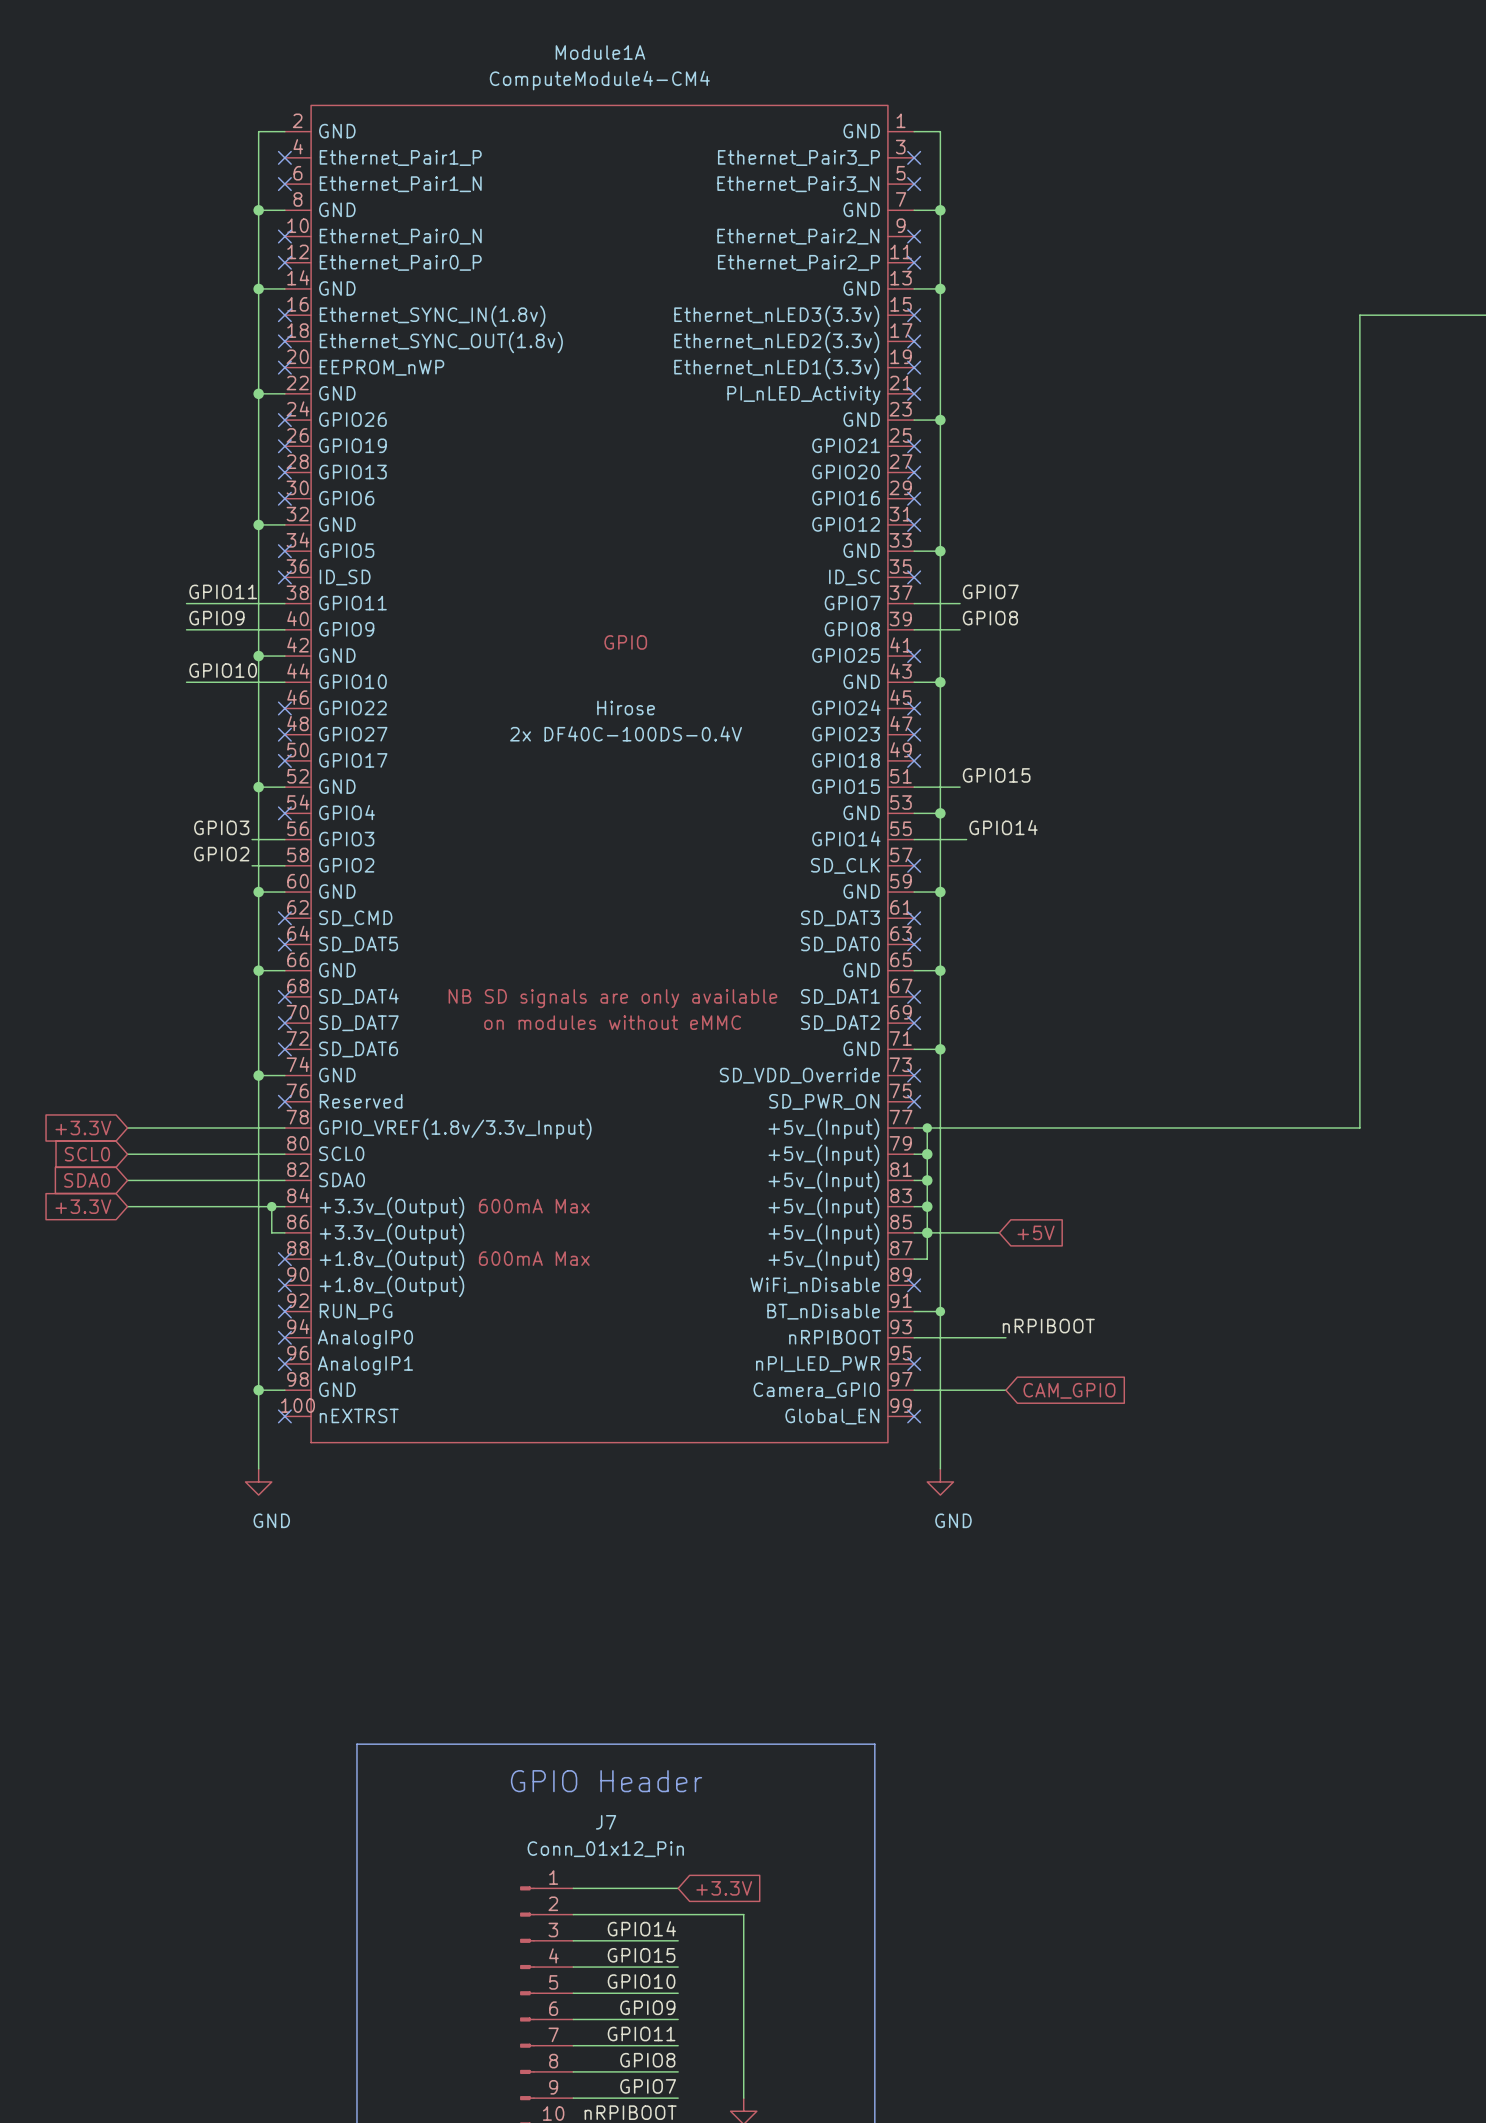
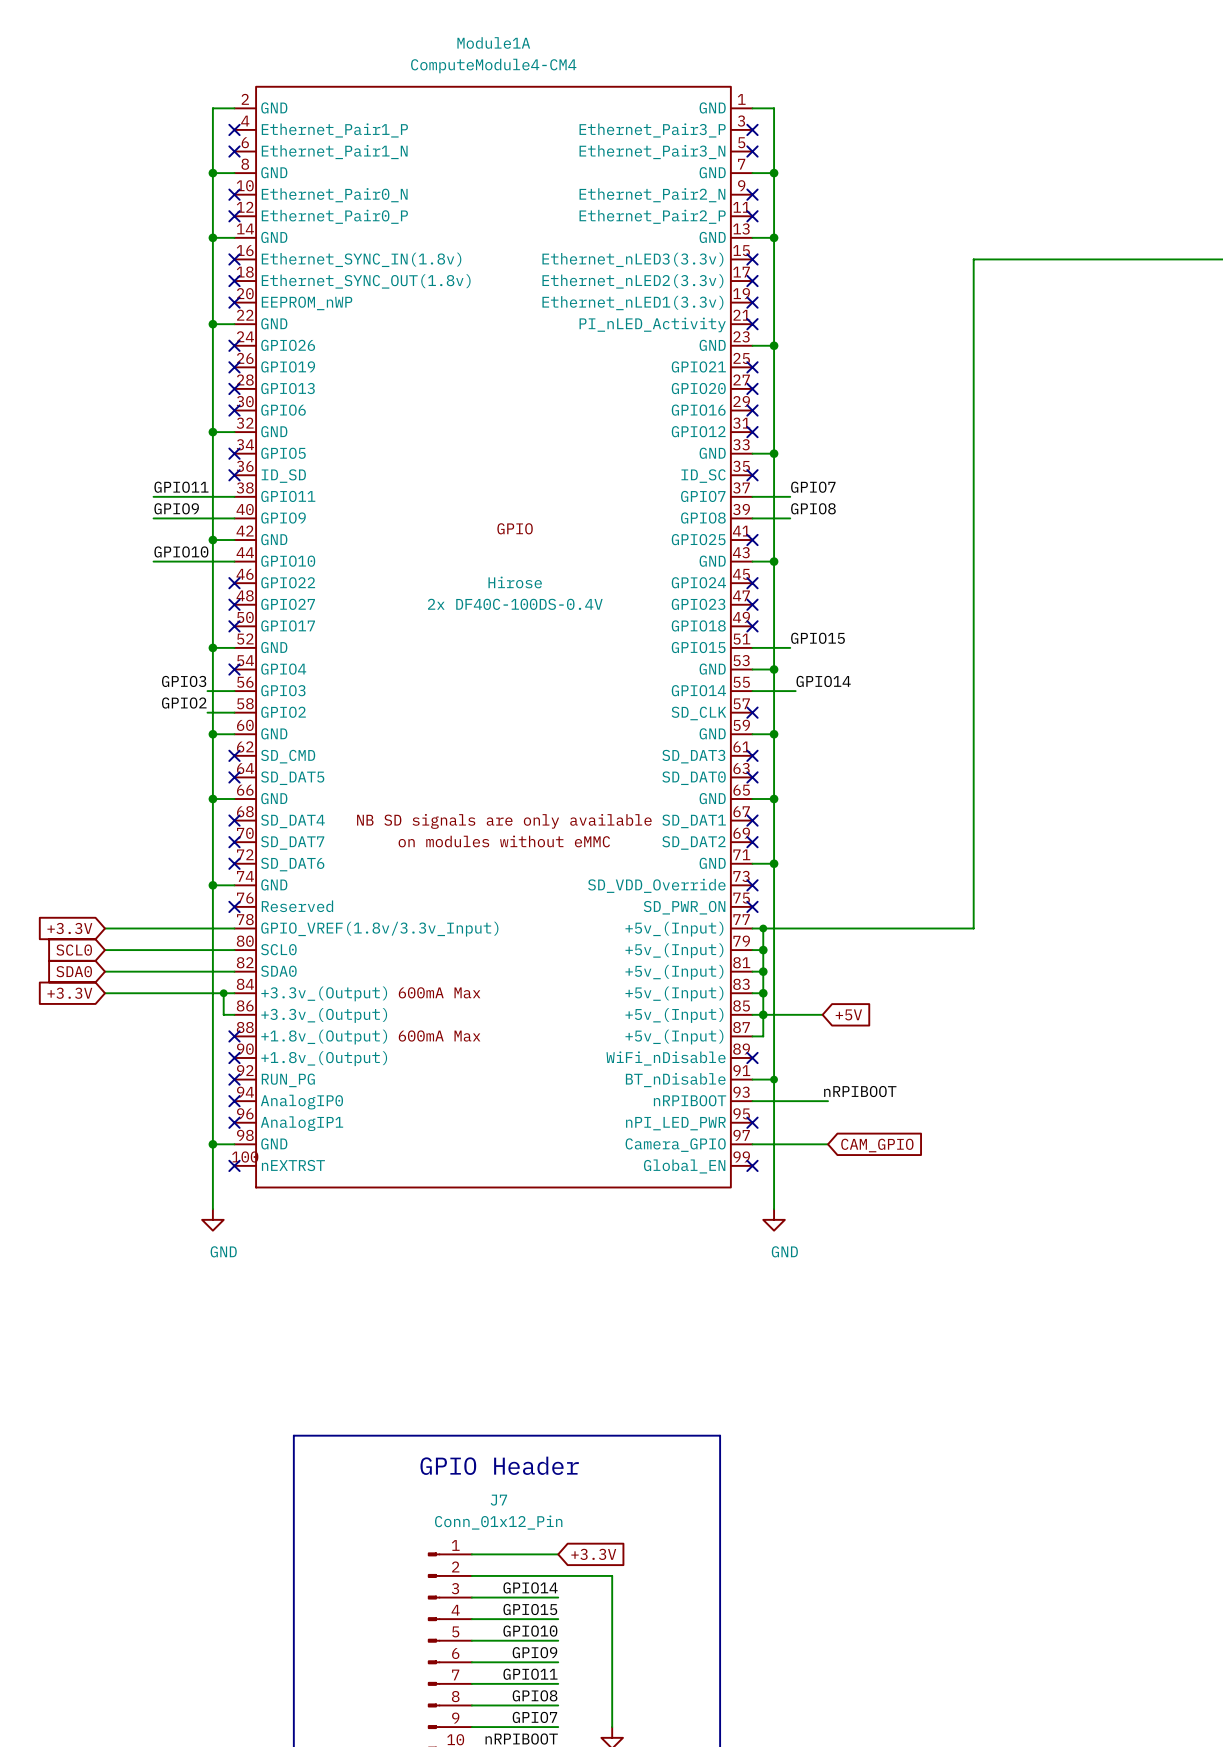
wire: (1359, 315) (1359, 1128) (1182, 1128) -> (1119, 259) (973, 259) (973, 928)

